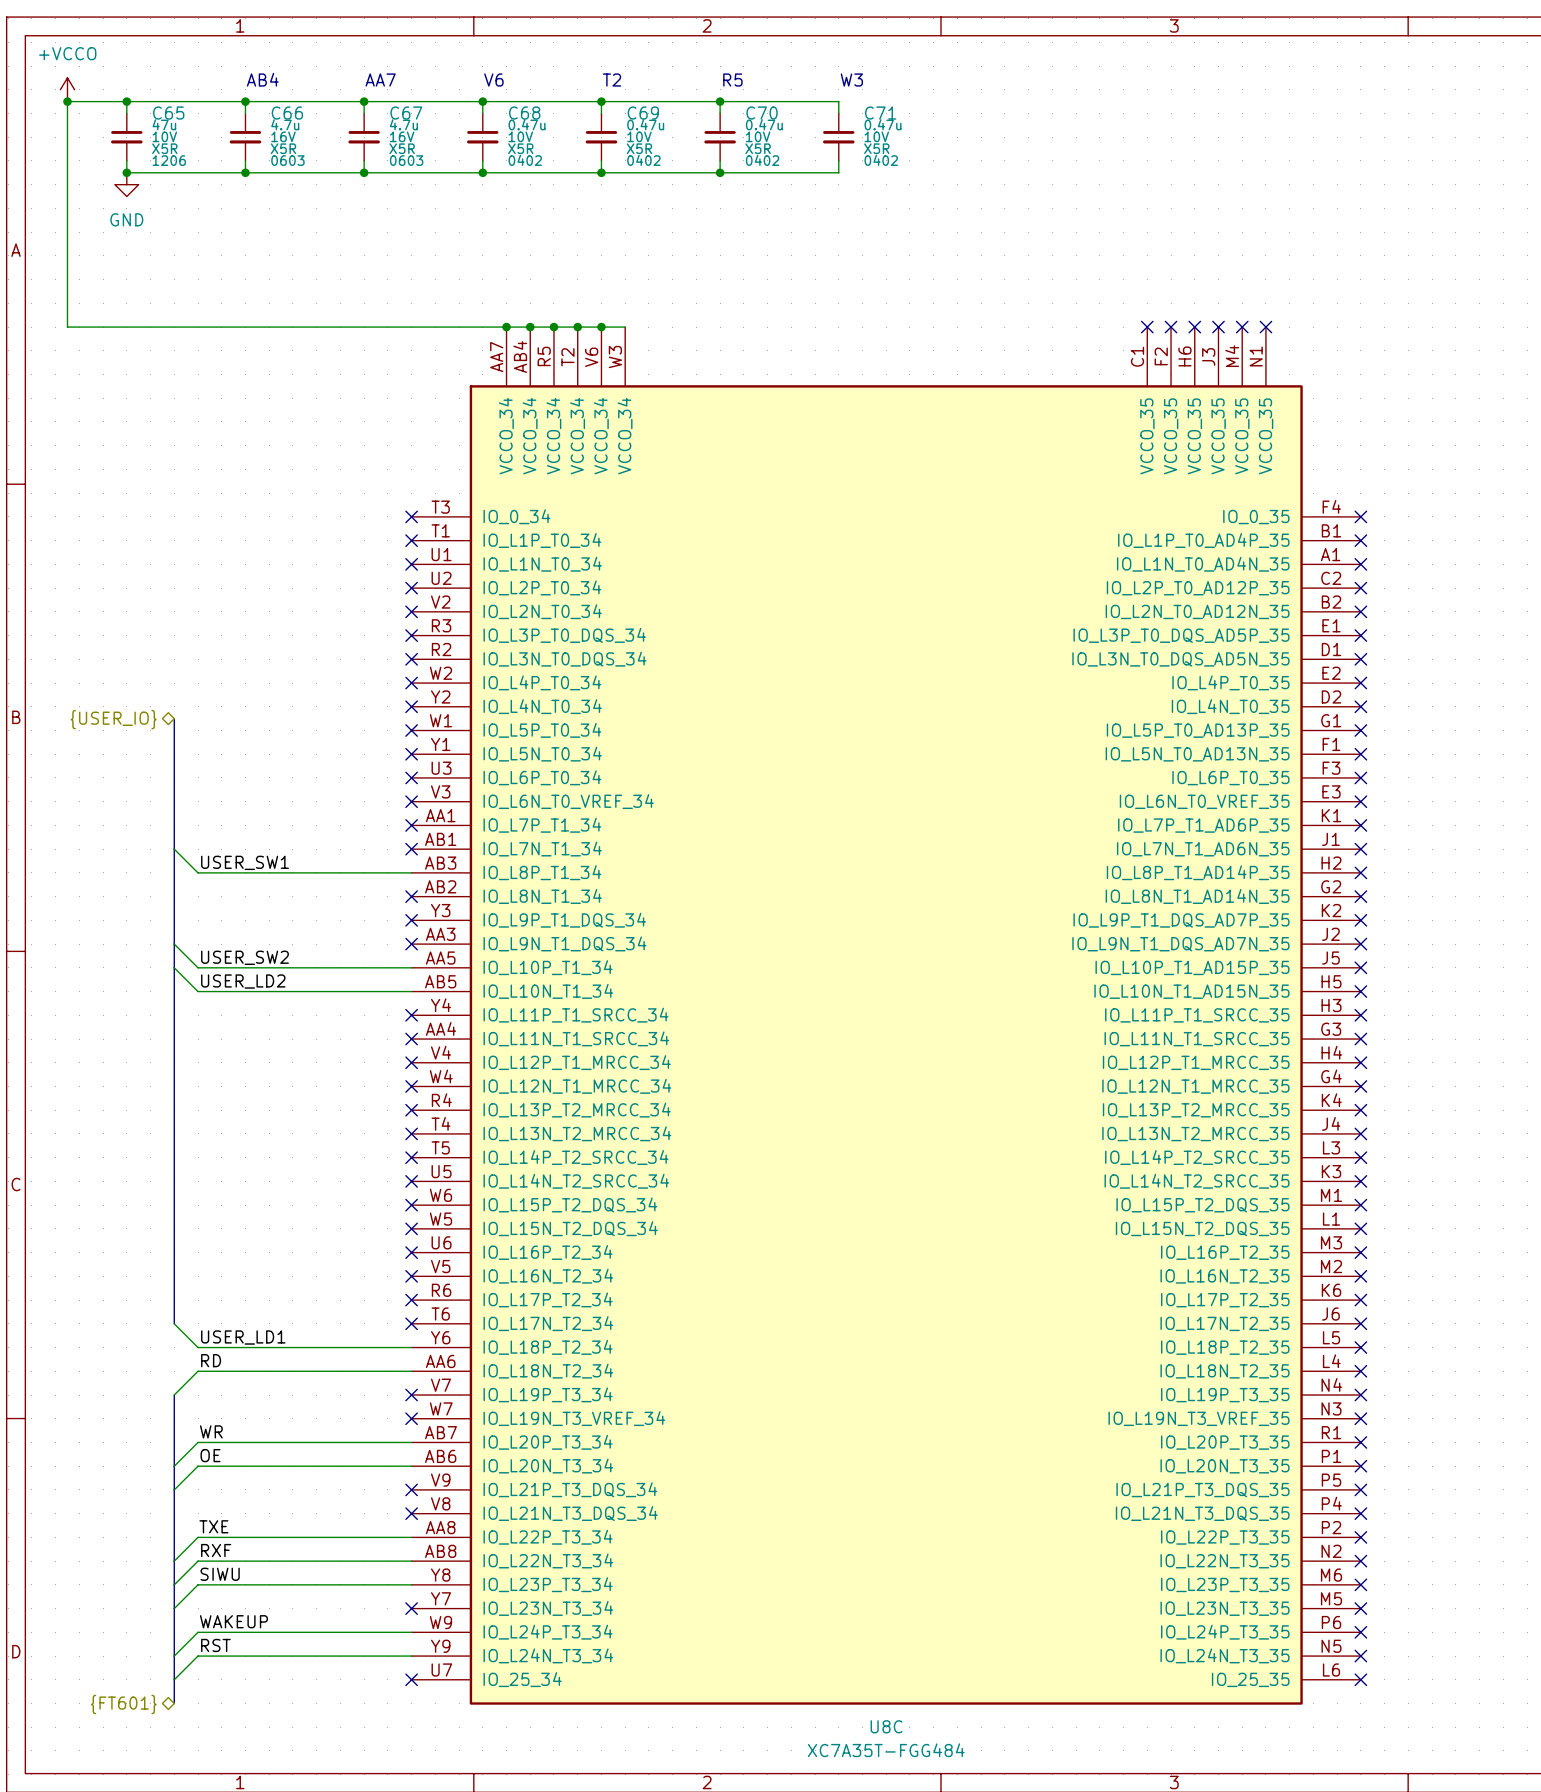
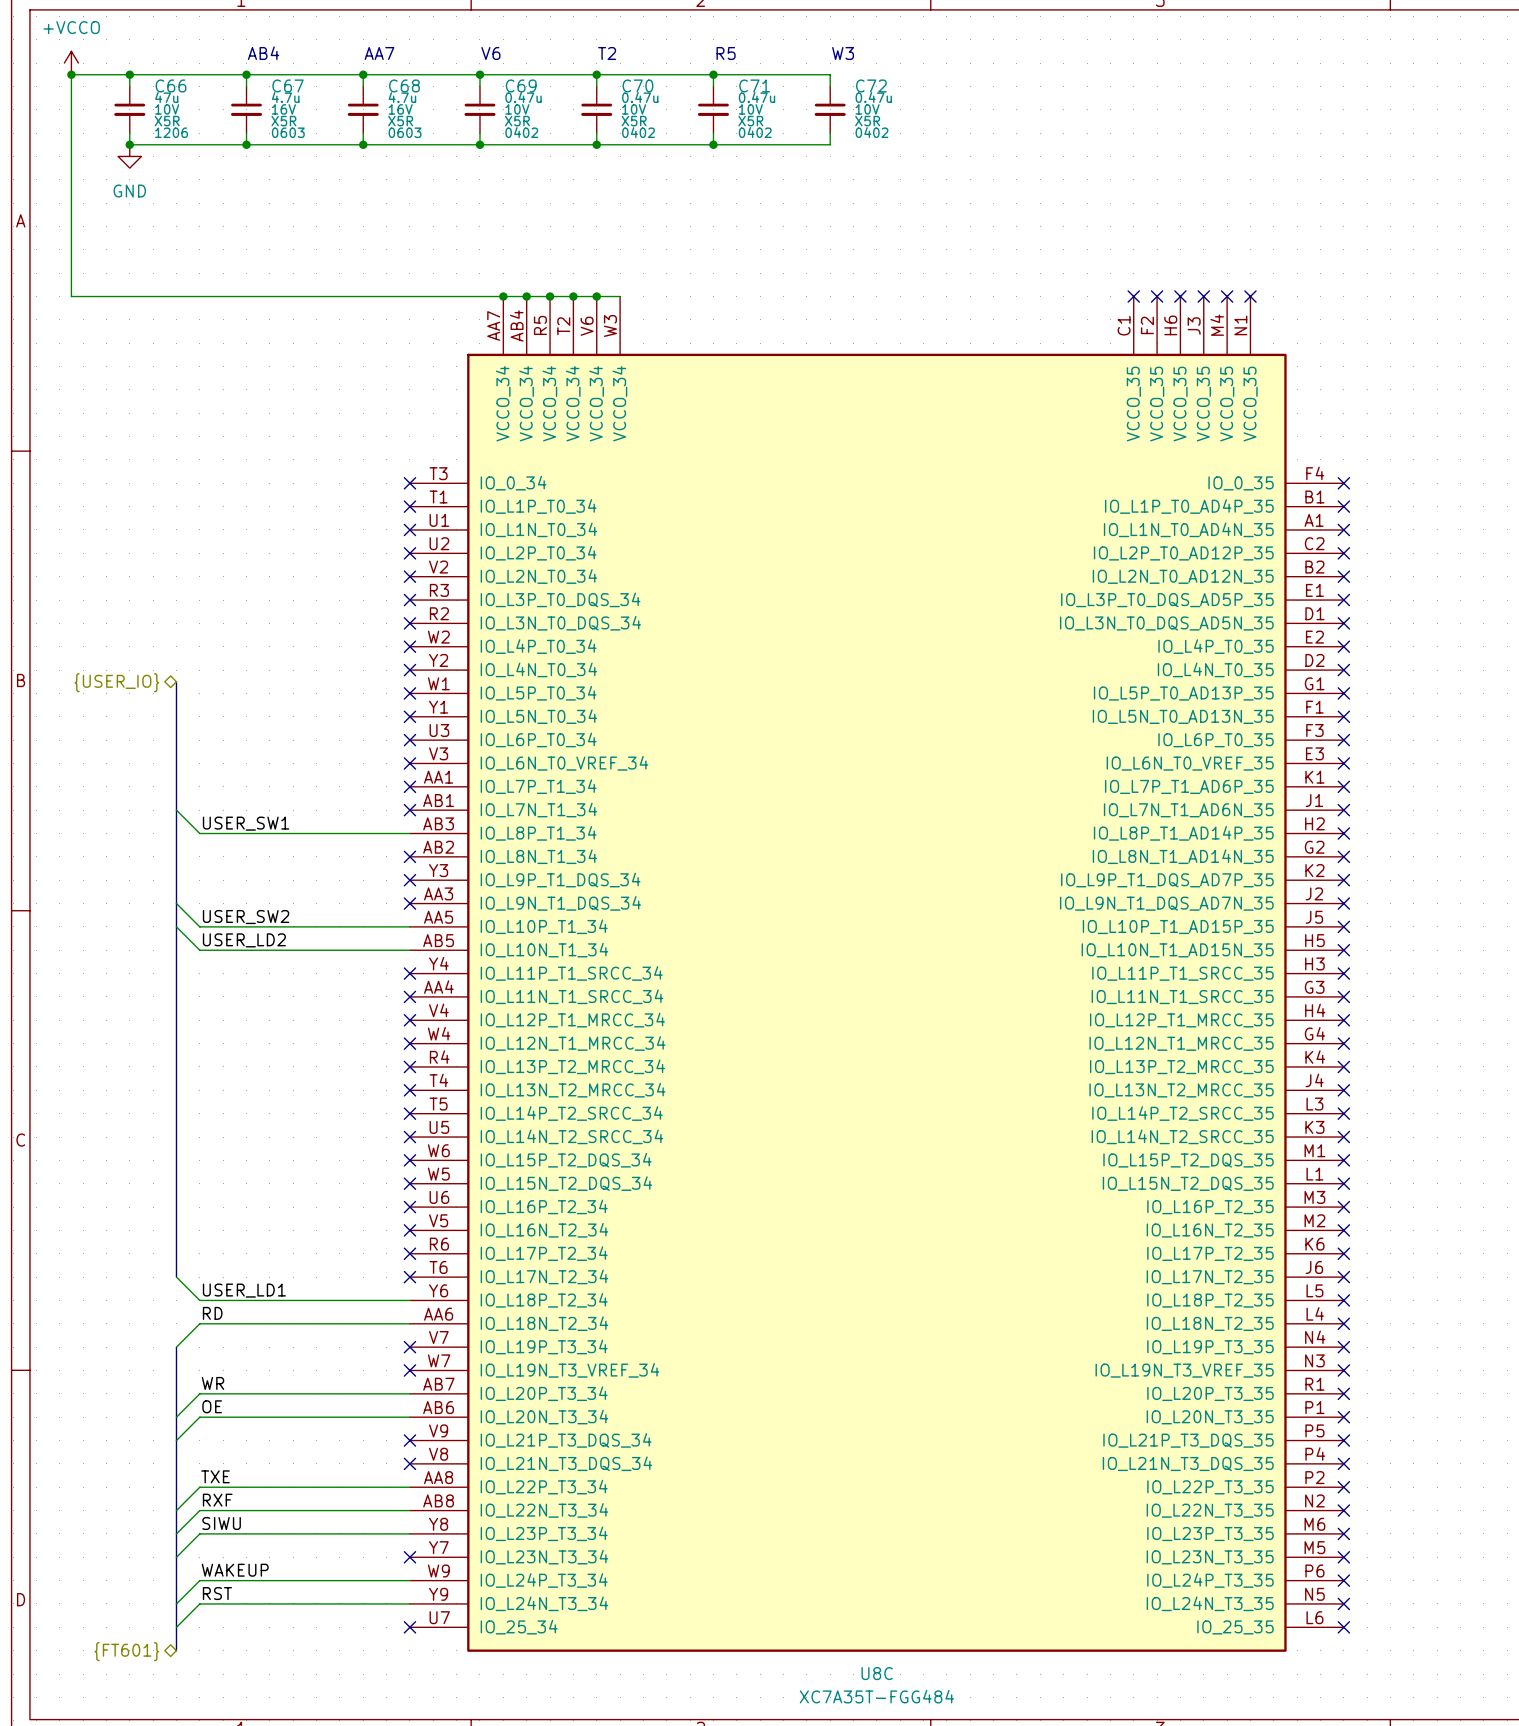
C65 name: C65 (168, 113) -> C66 (171, 85)
C66 name: C66 (287, 113) -> C67 (288, 85)
C67 name: C67 (406, 113) -> C68 (404, 85)
C68 name: C68 (524, 113) -> C69 (521, 85)
C69 name: C69 (643, 113) -> C70 (637, 85)
C70 name: C70 (762, 113) -> C71 (754, 85)
C71 name: C71 (880, 113) -> C72 (871, 85)

